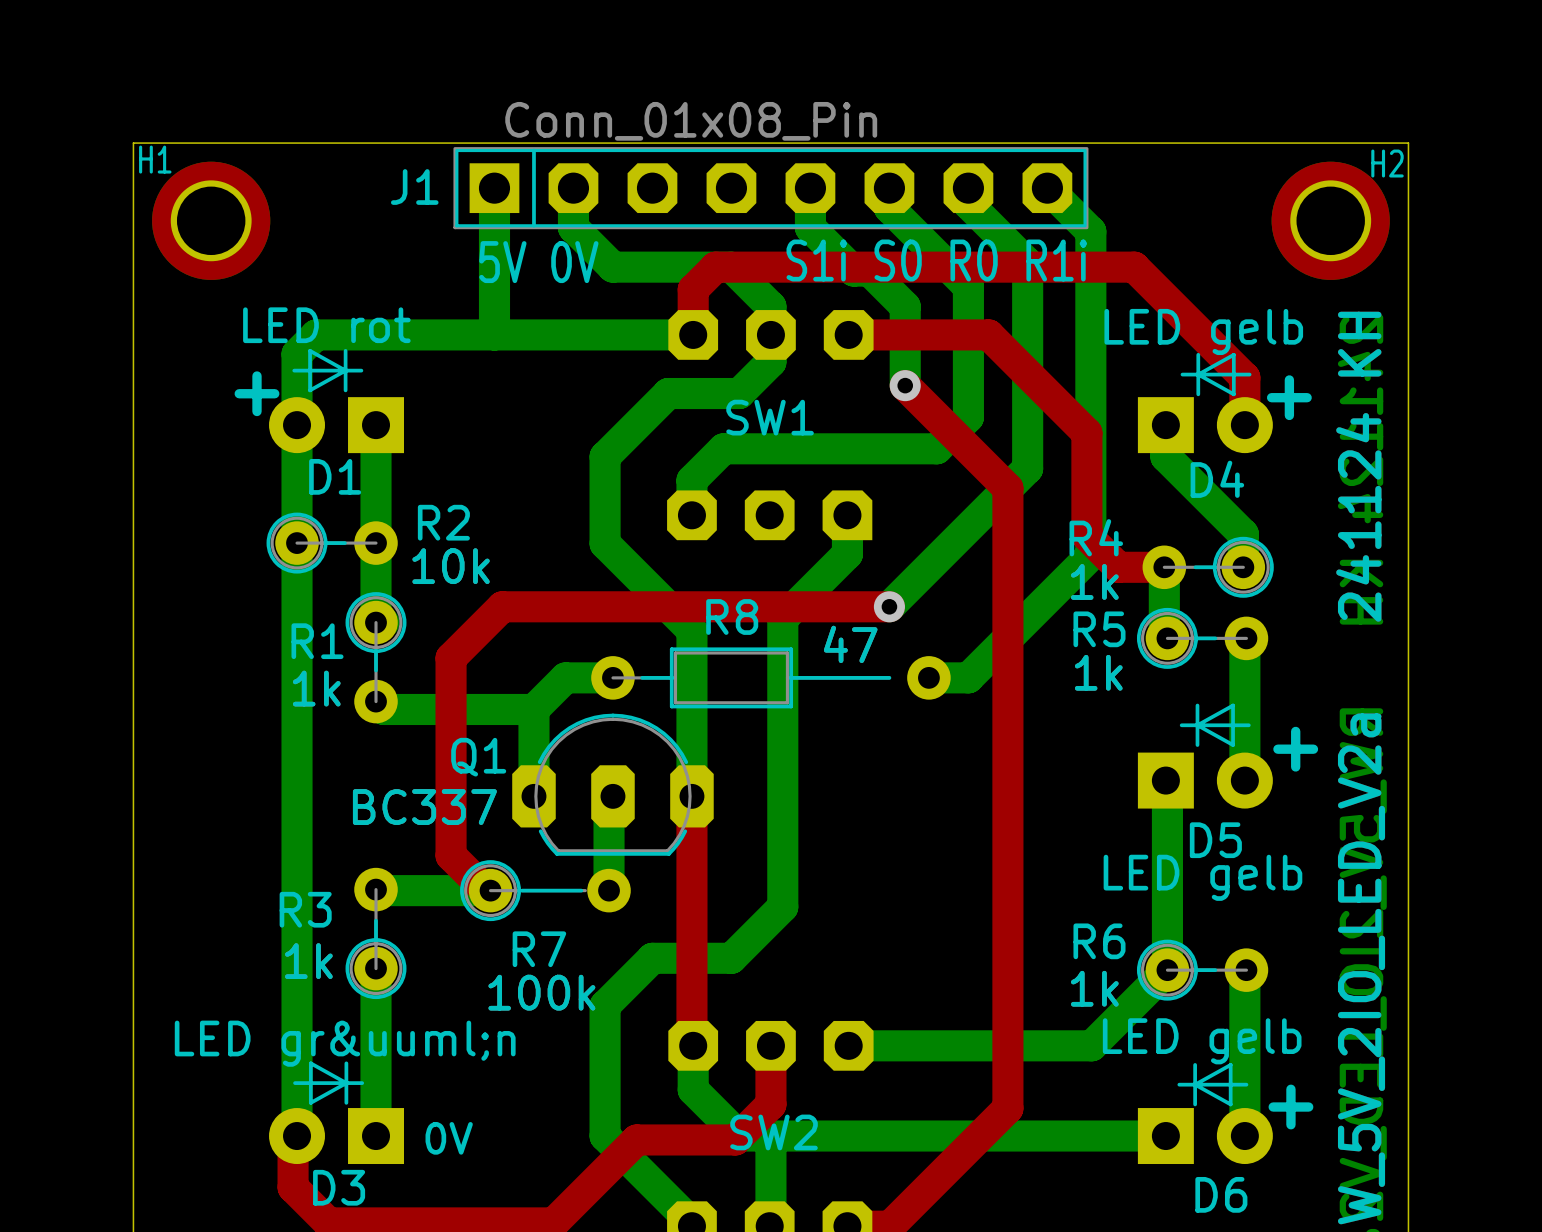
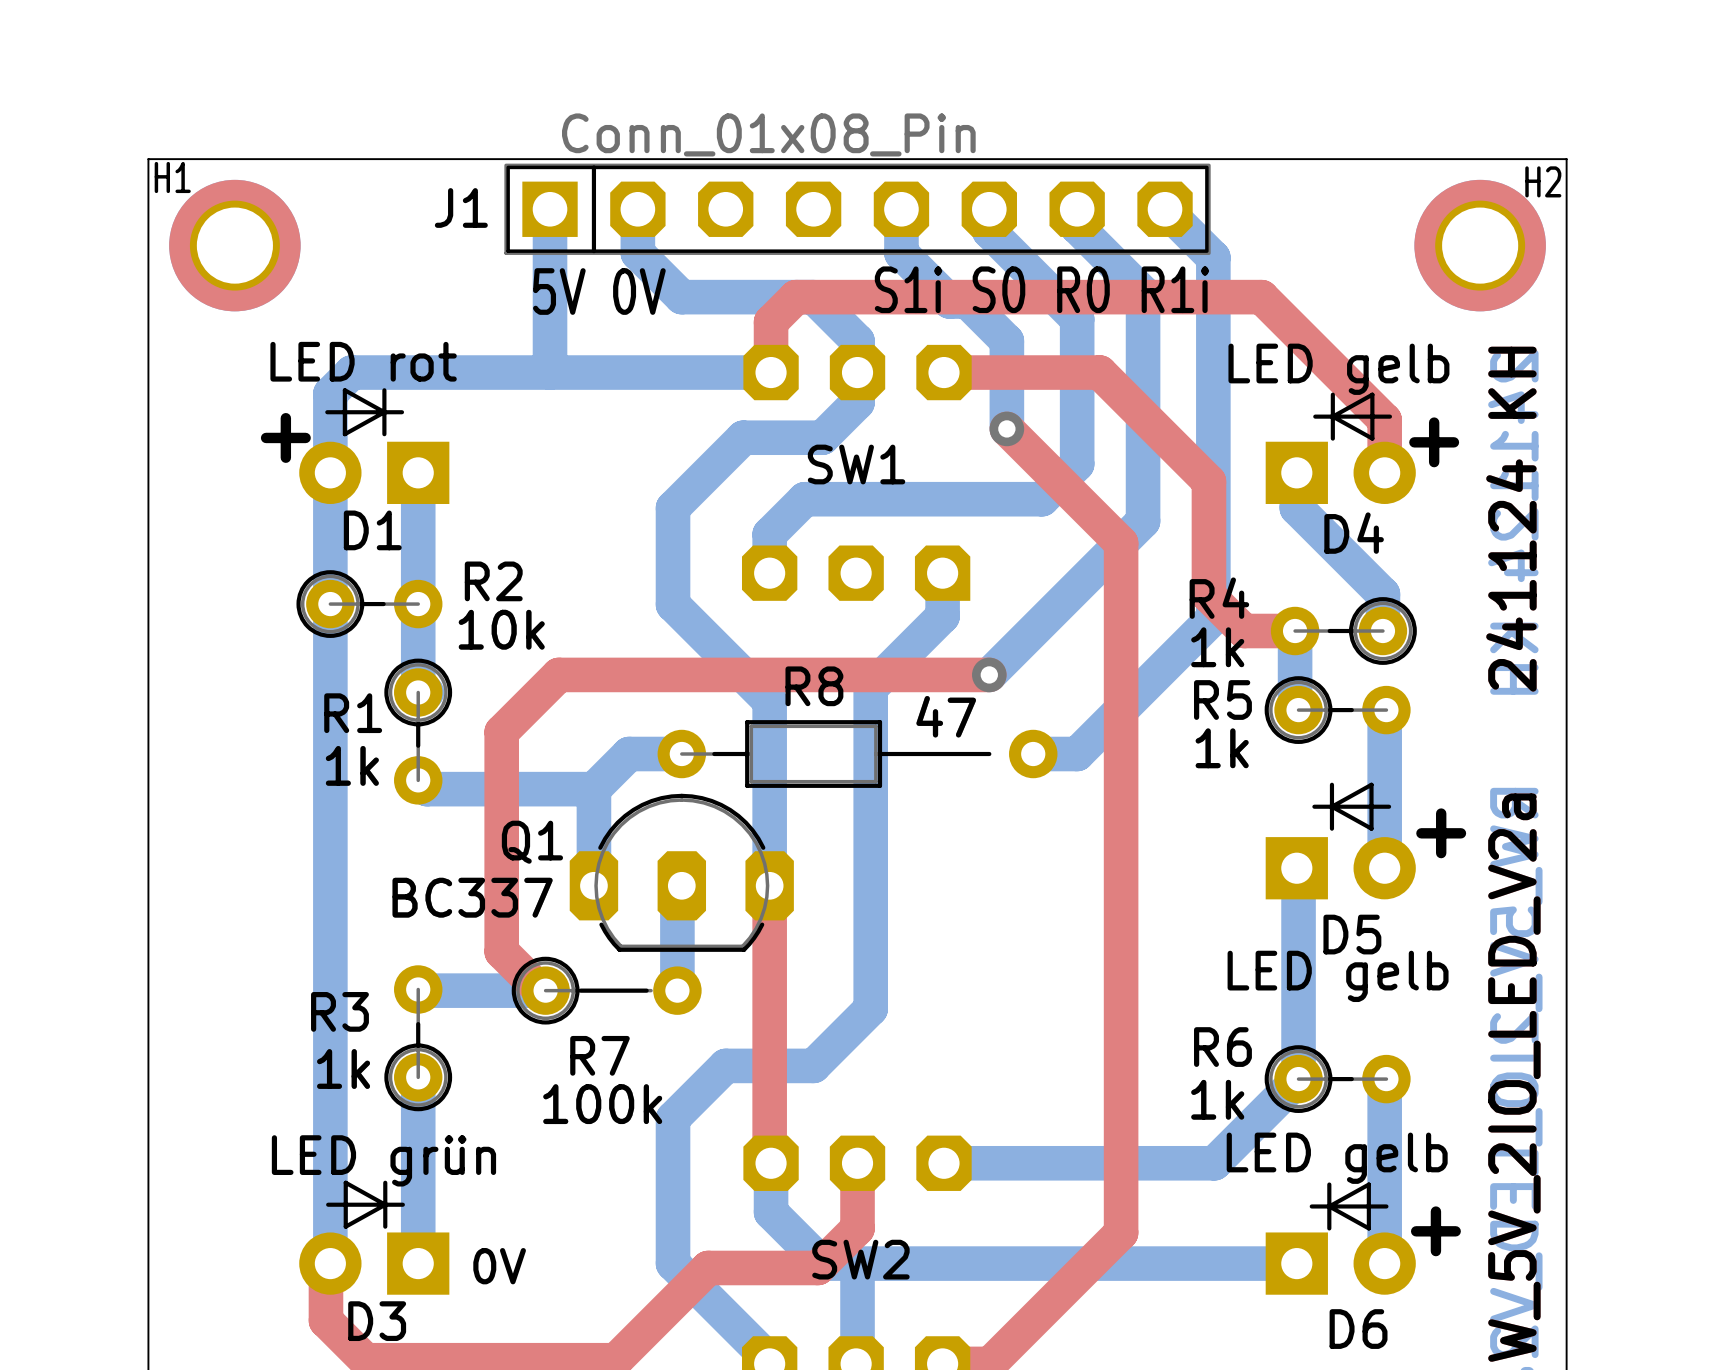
text: LED gr&uuml;n (345, 1043) -> LED grün (383, 1160)

